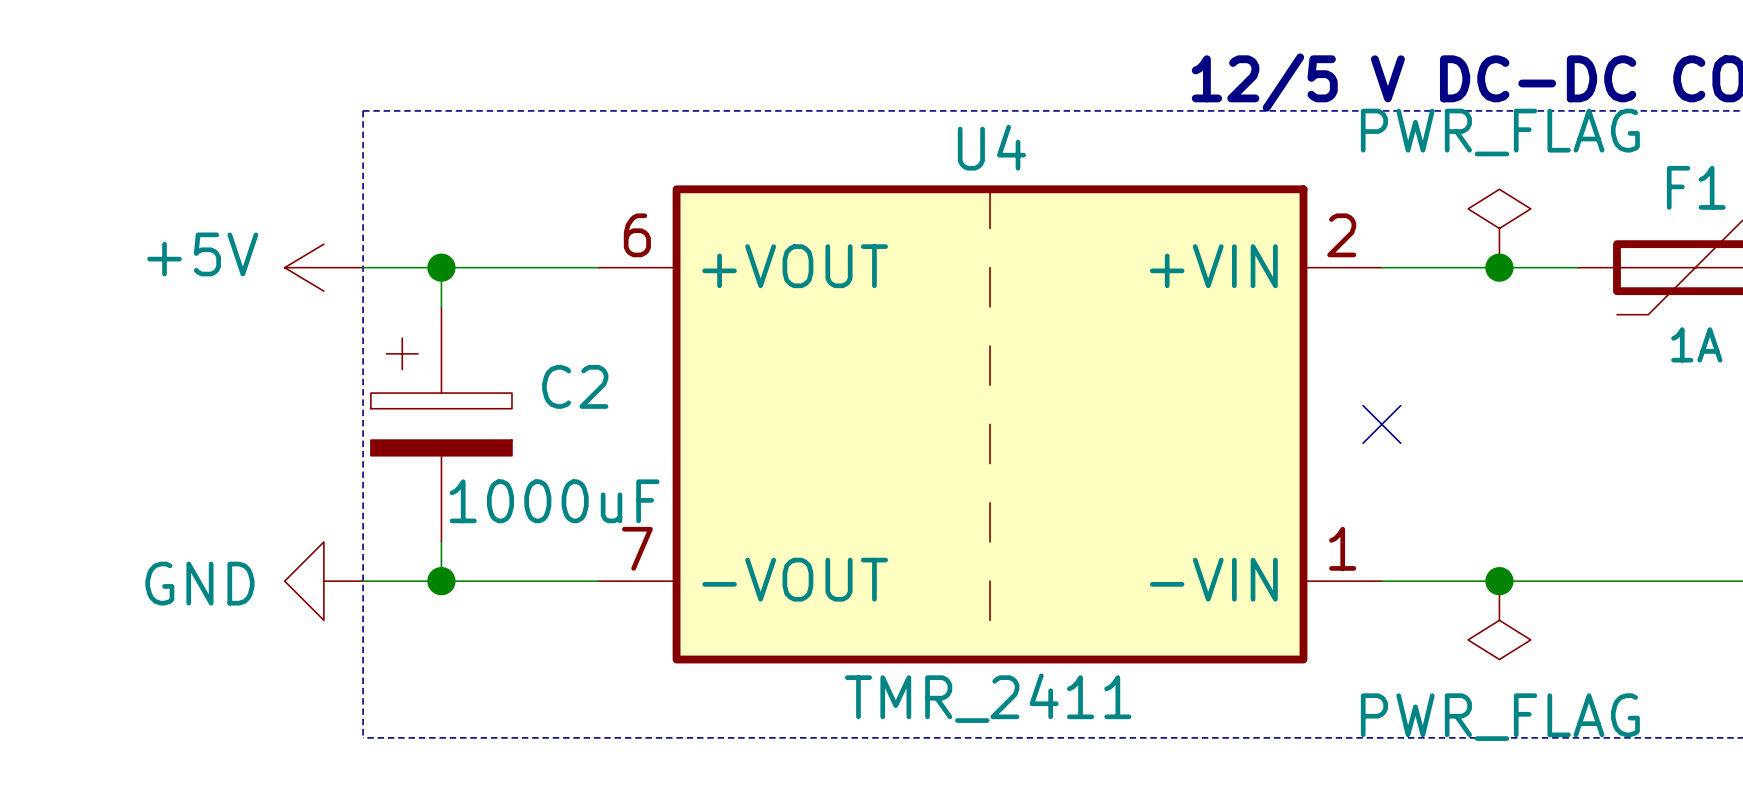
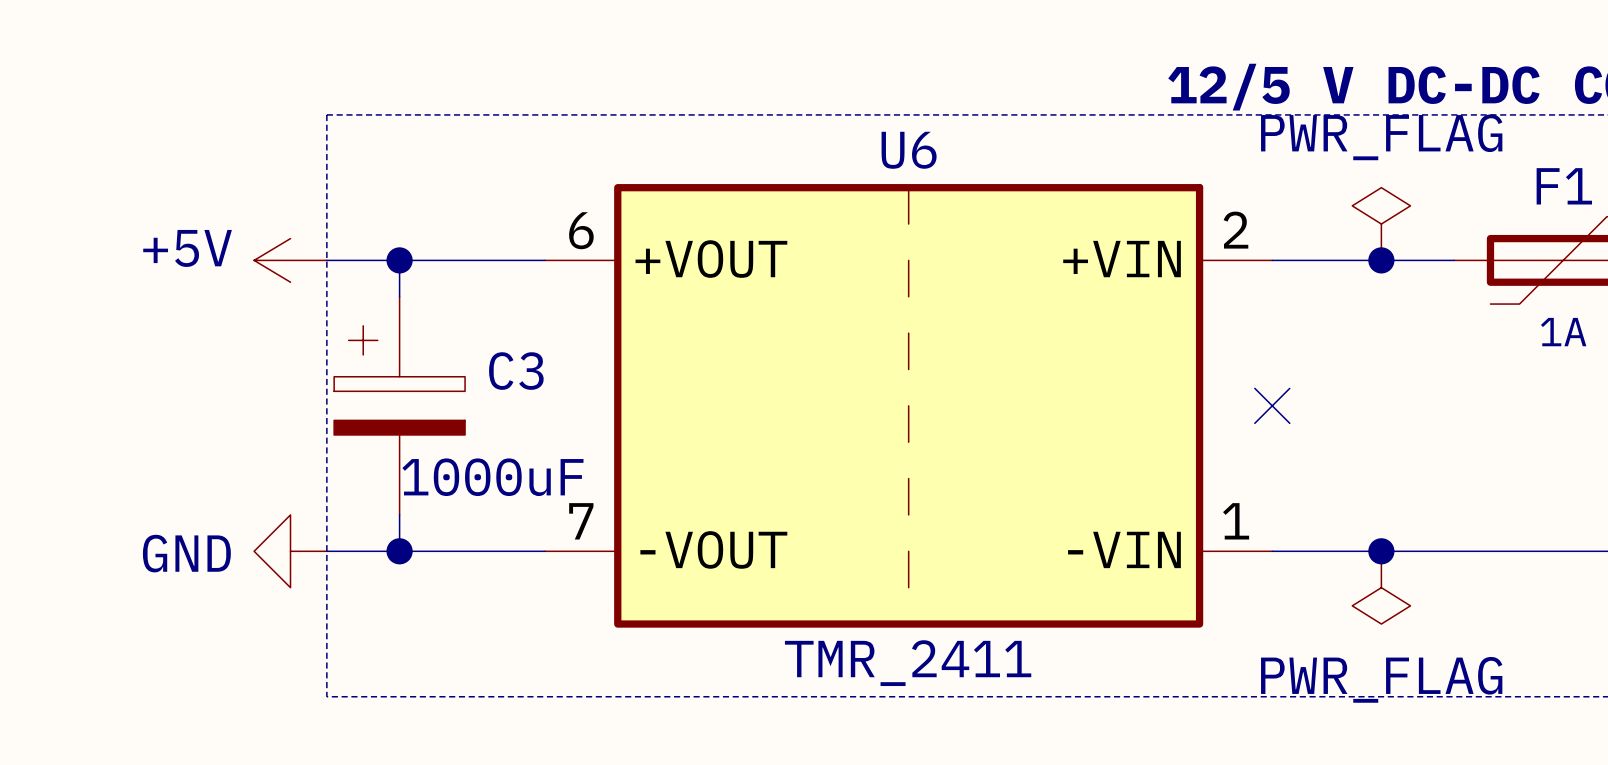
U4 name: U4 (991, 147) -> U6 (909, 150)
C2 name: C2 (575, 386) -> C3 (516, 371)

